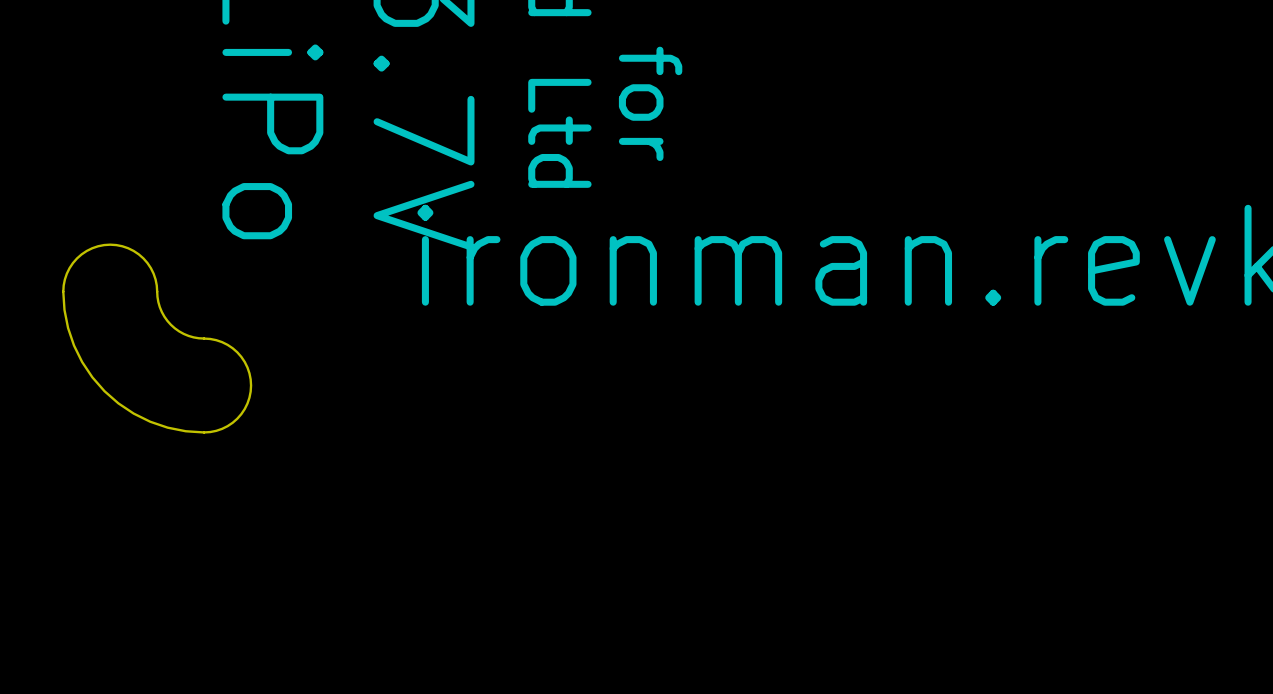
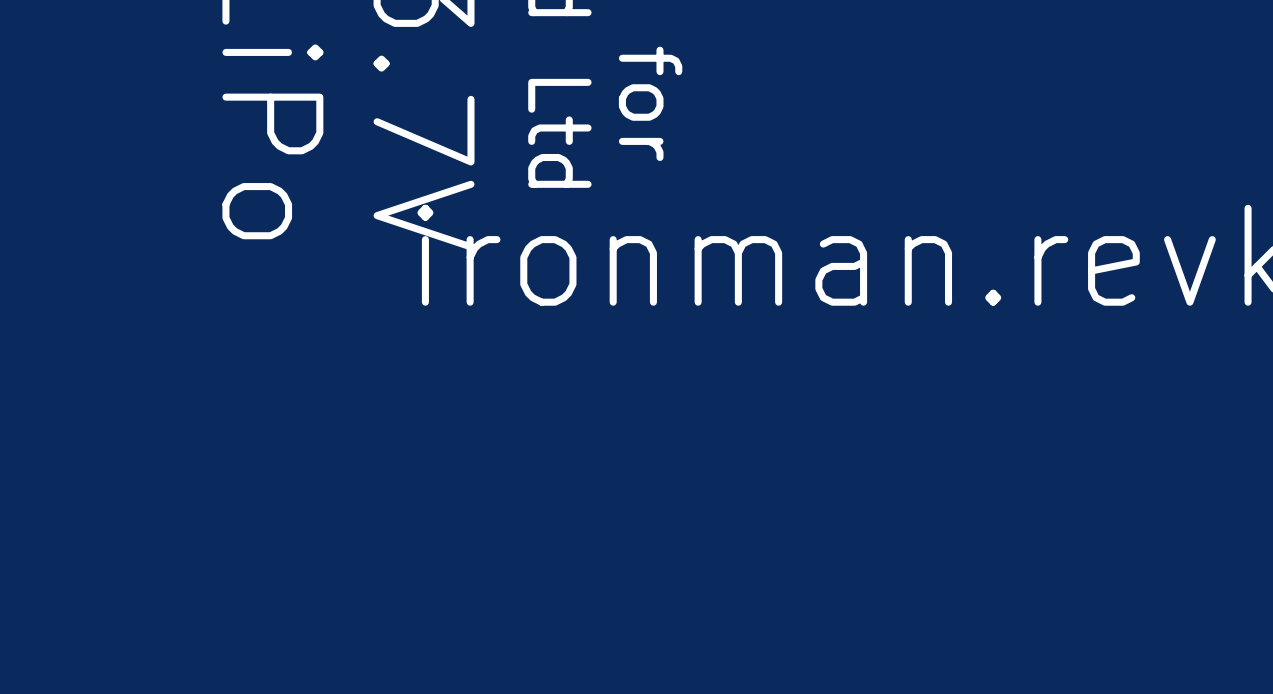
board edge: (157, 291) (161, 311) (174, 328) (188, 335) (222, 342) (237, 352) (244, 362) (250, 379) (249, 397) (241, 414) (227, 426) (216, 430) (204, 432) (167, 427) (150, 421) (118, 403) (104, 391) (82, 362) (68, 328) (63, 291) (66, 273) (77, 258) (86, 250) (98, 246) (110, 244) (128, 248) (138, 254) (147, 263) (153, 273) (157, 291) -> none

